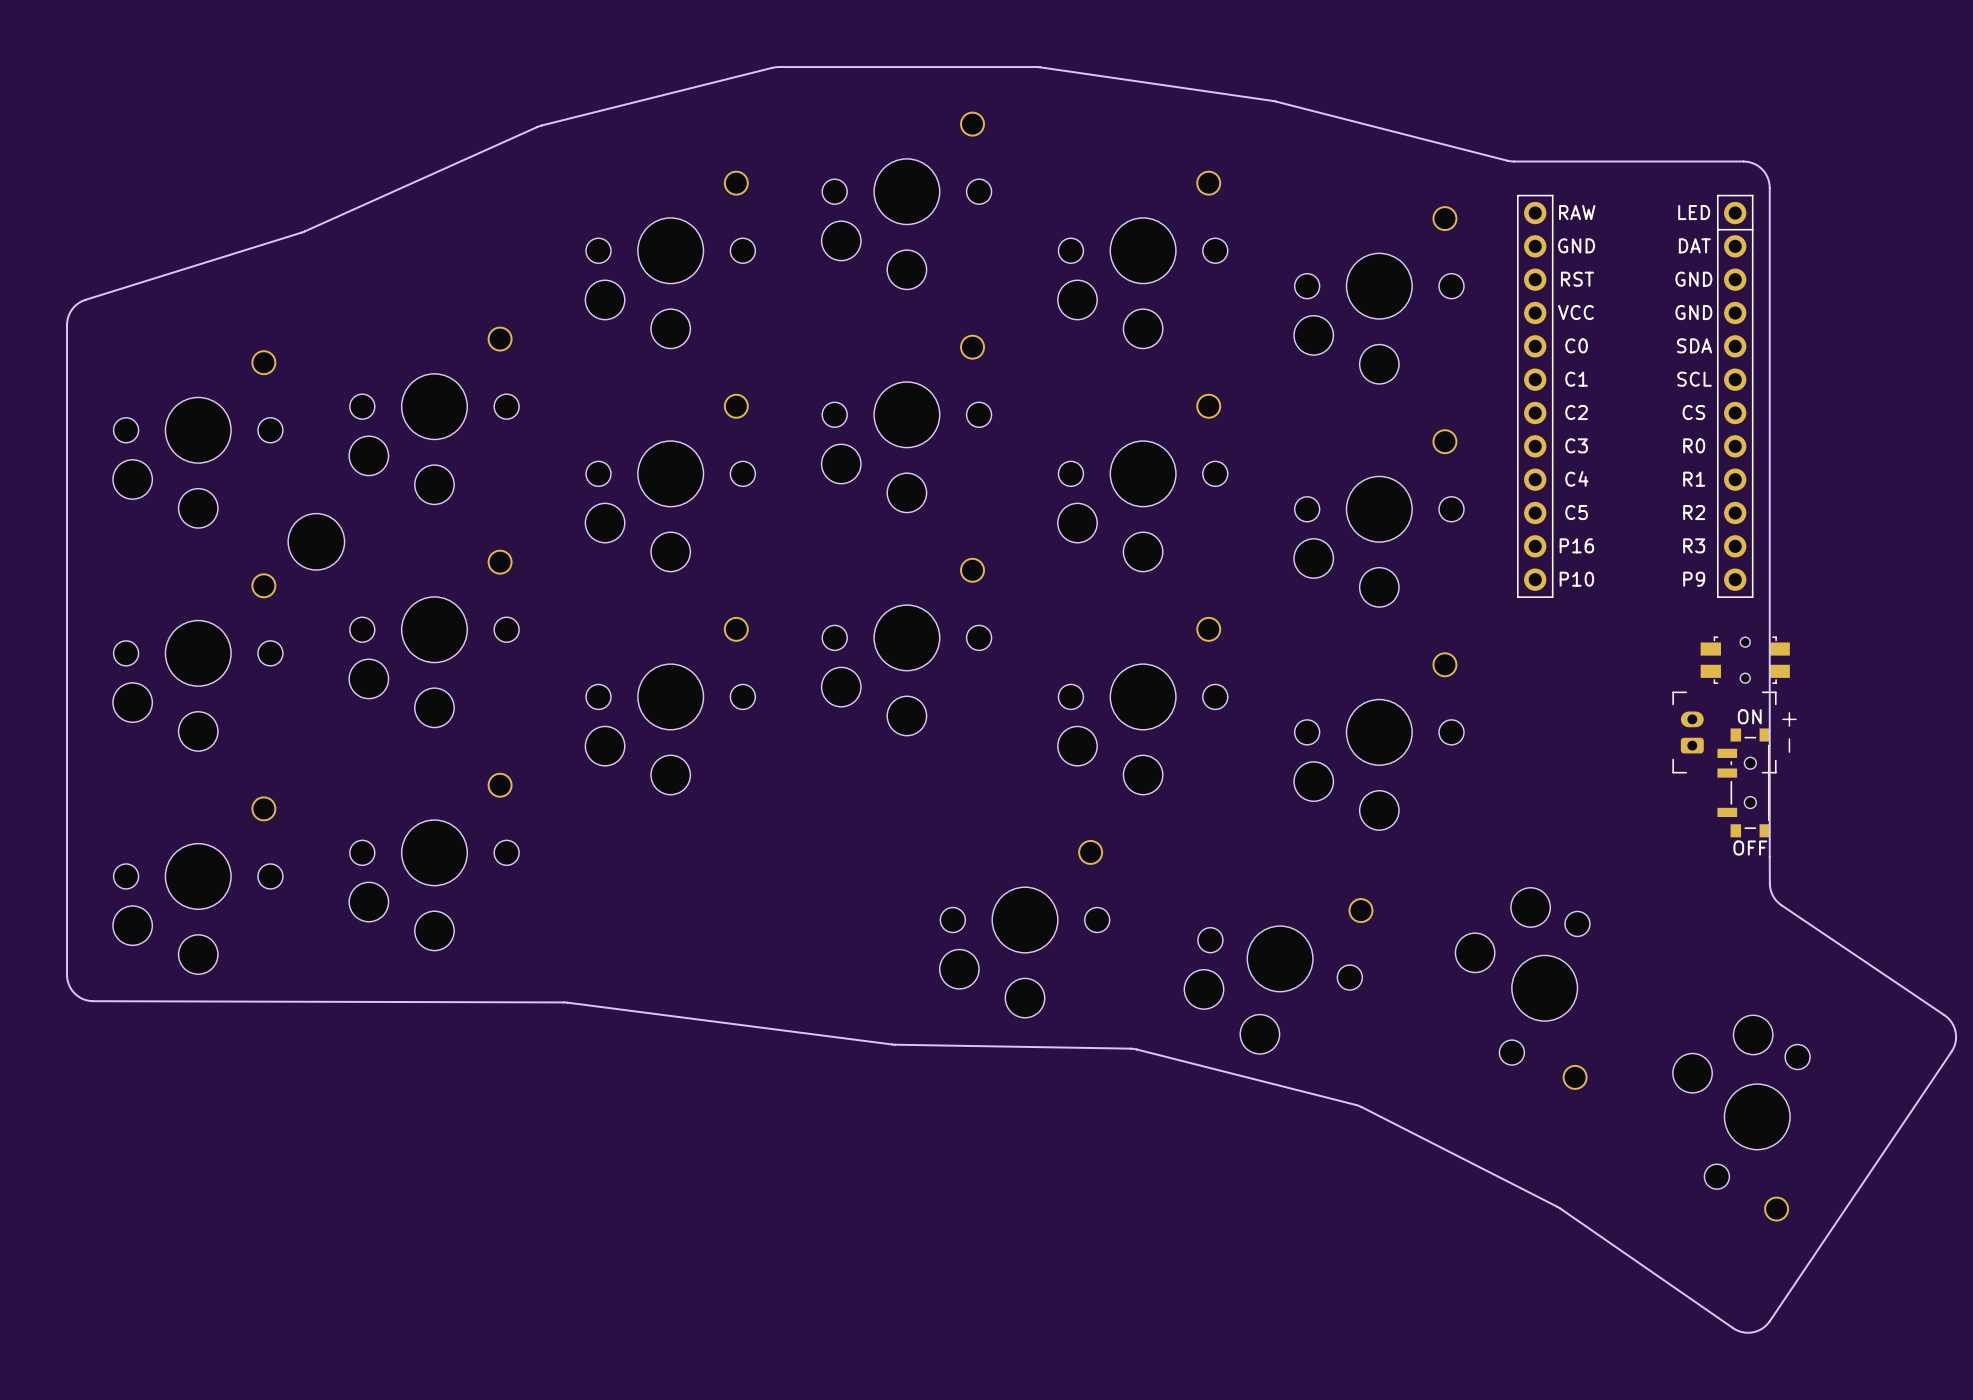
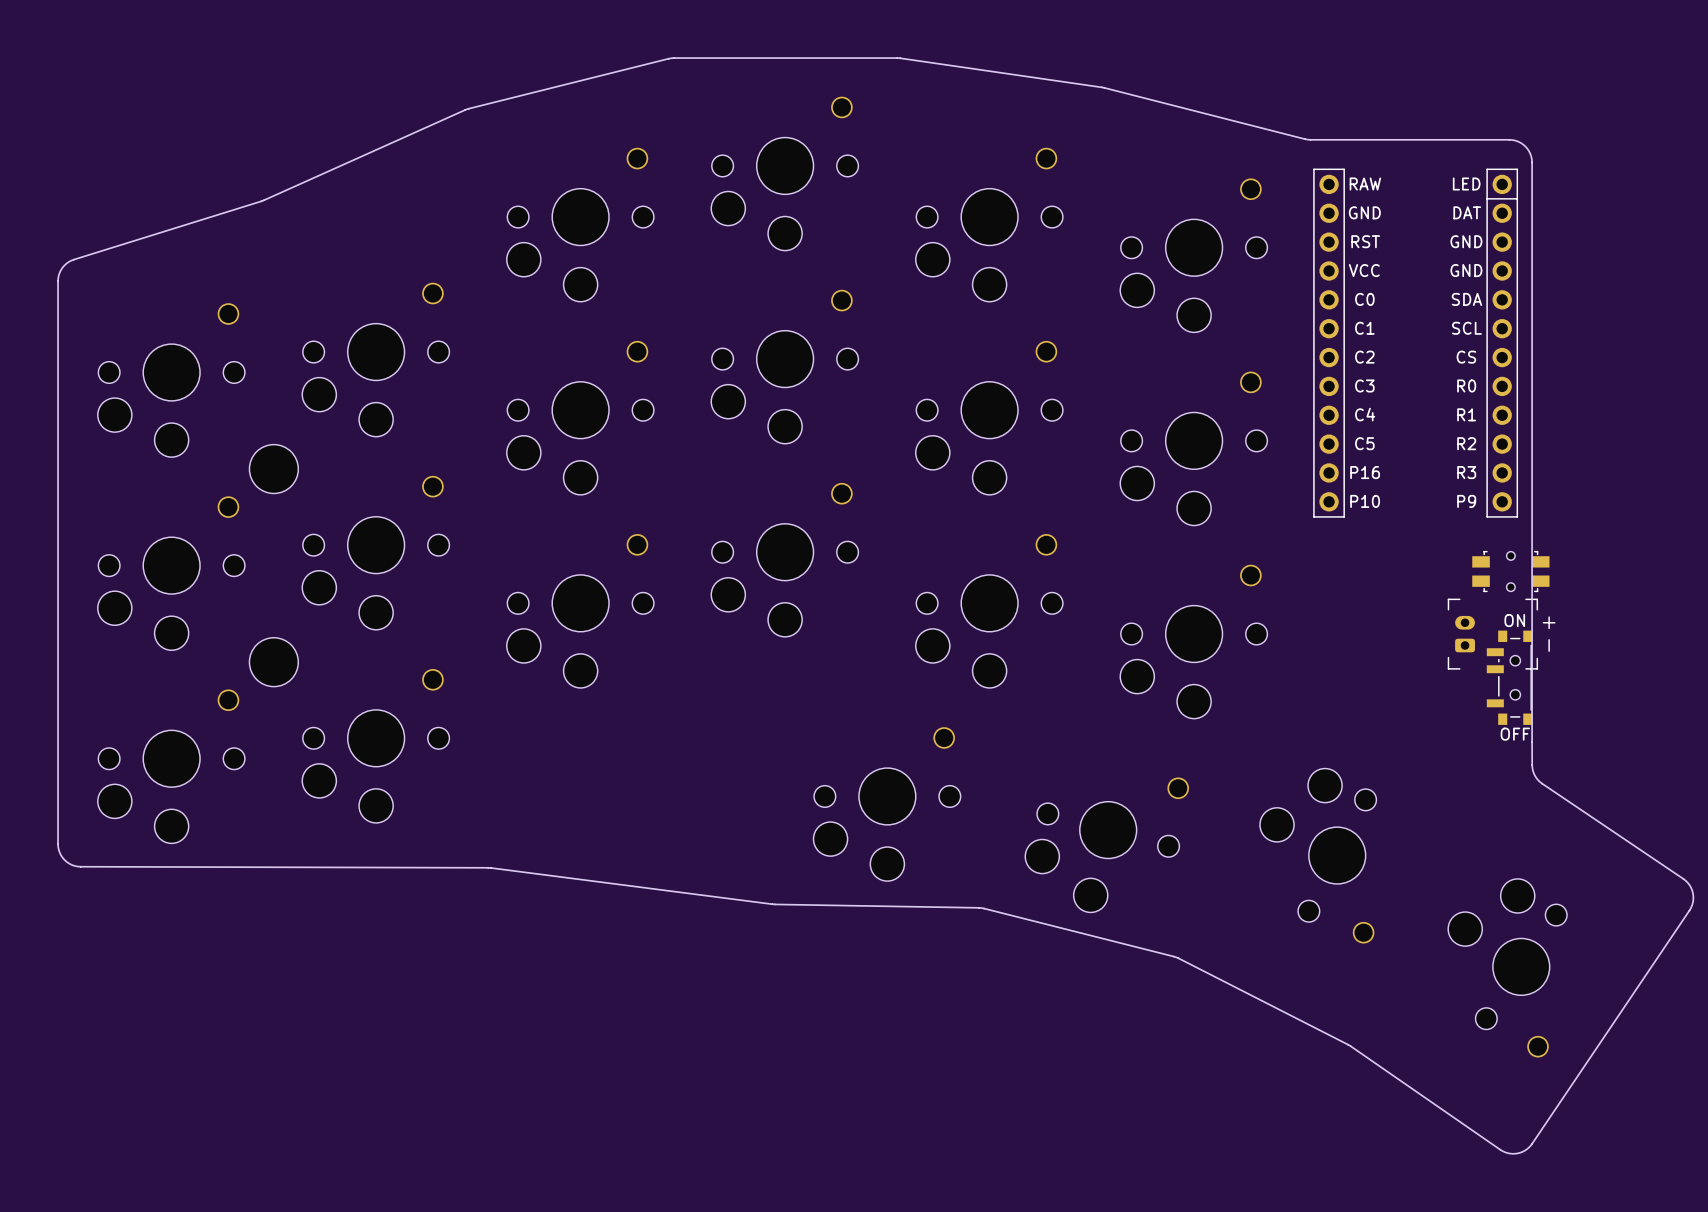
part: none -> (273, 662)

